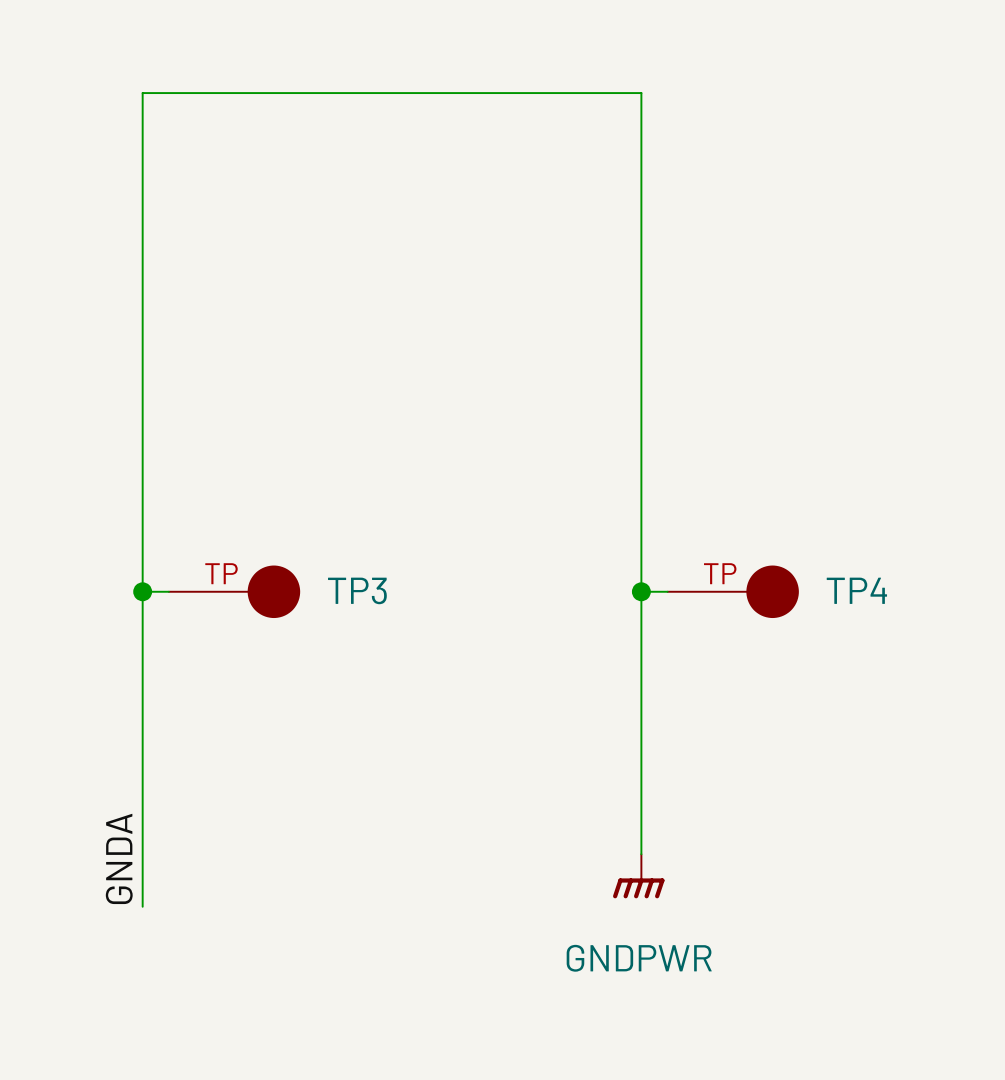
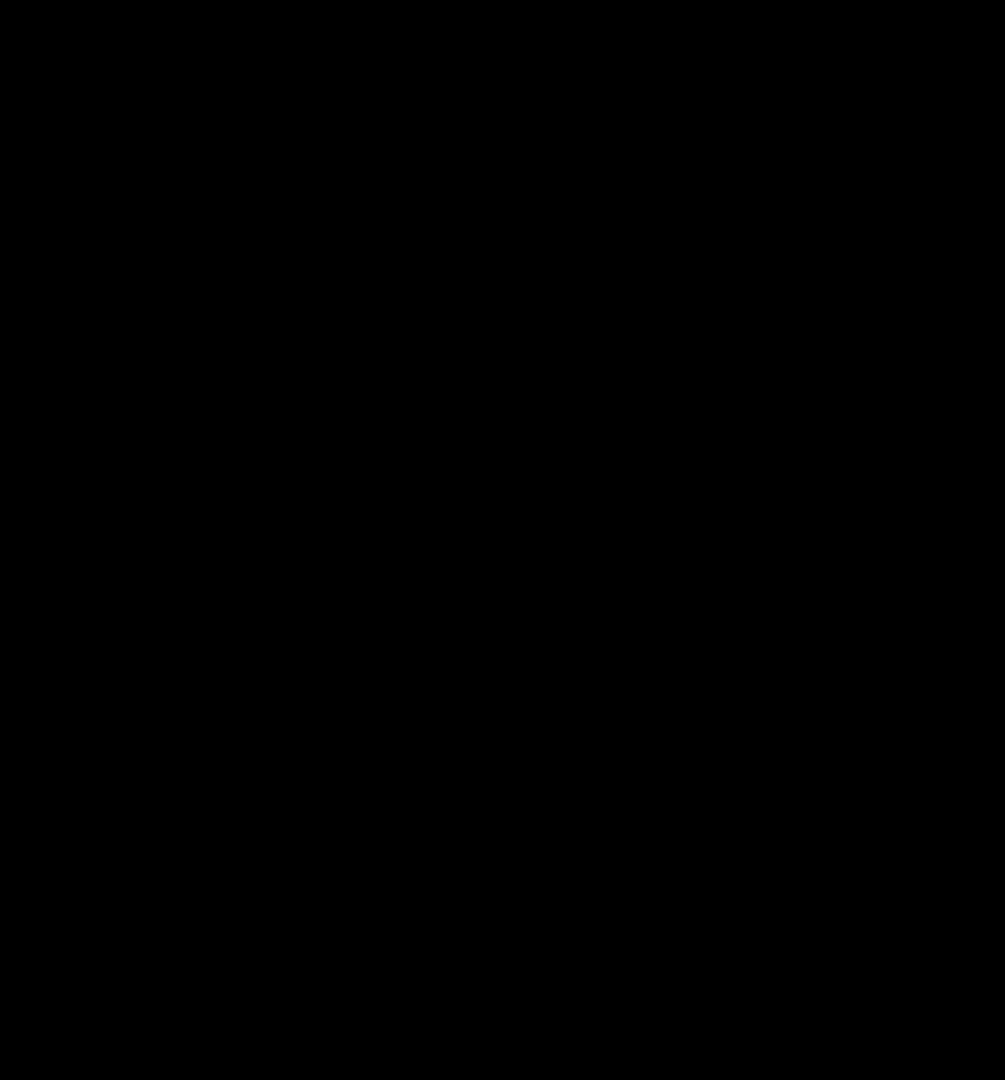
wire: (142, 591) (168, 591) -> none
junction: (142, 591) -> none
TP3: (234, 591) -> none
wire: (641, 591) (667, 591) -> none
junction: (641, 591) -> none
TP4: (733, 591) -> none
wire: (641, 854) (641, 93) (142, 93) (142, 906) -> none
label: GNDA (119, 858) -> none
power symbol: GNDPWR (638, 876) -> none

